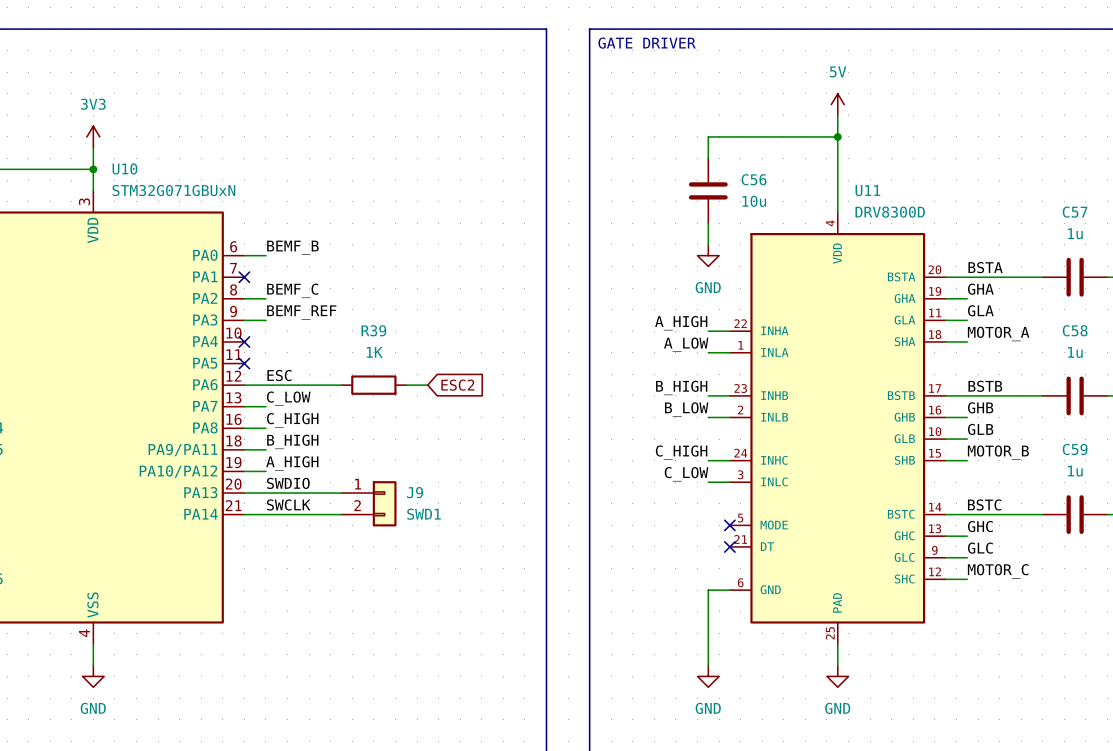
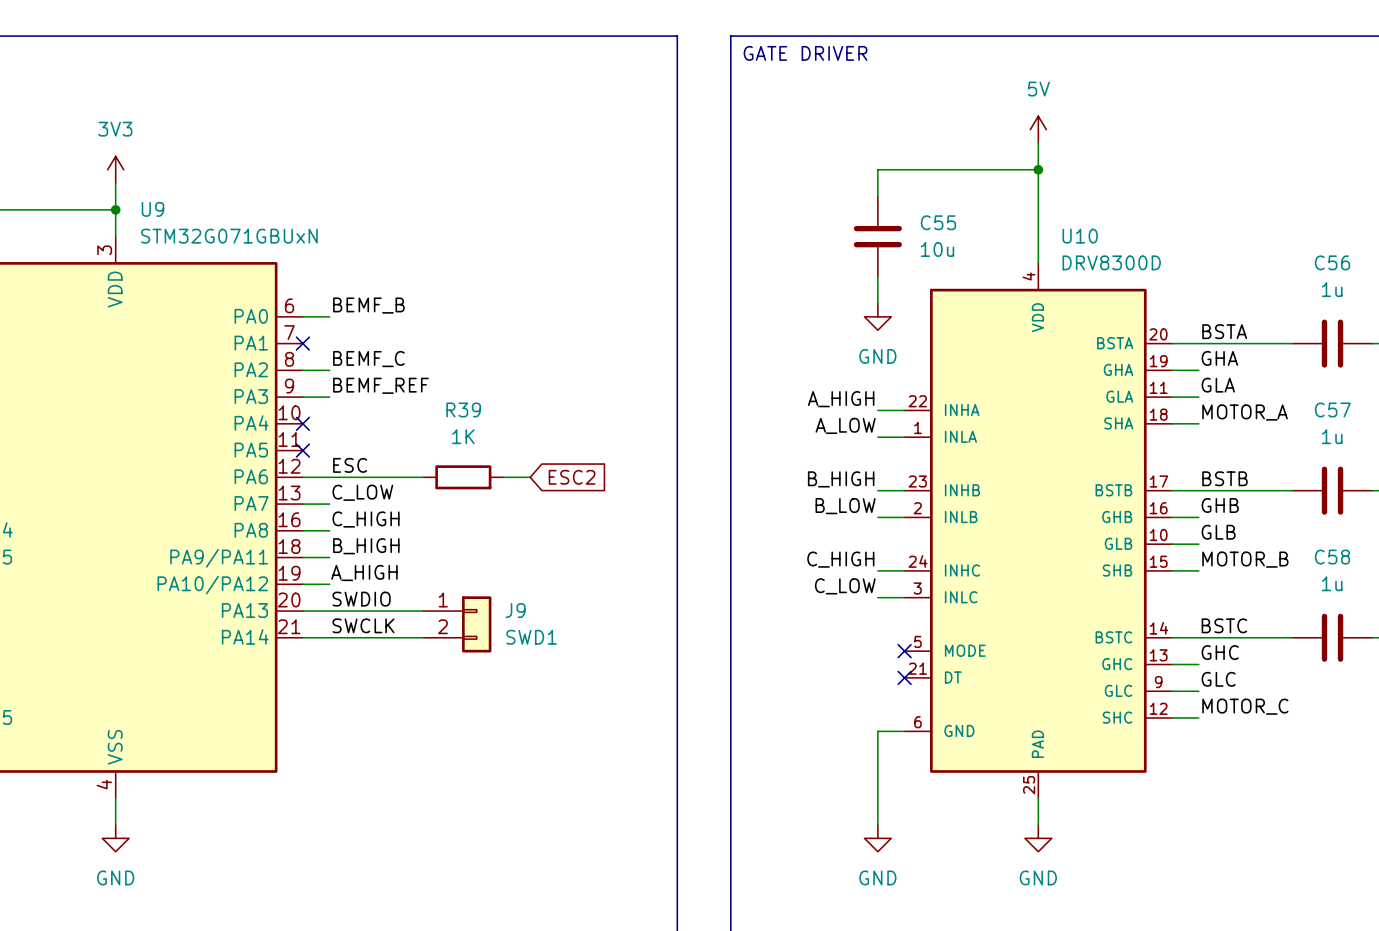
U10 name: U10 (124, 168) -> U9 (153, 209)
C56 name: C56 (754, 179) -> C55 (938, 222)
U11 name: U11 (867, 190) -> U10 (1080, 236)
C57 name: C57 (1075, 212) -> C56 (1332, 262)
C58 name: C58 (1075, 330) -> C57 (1332, 409)
C59 name: C59 (1075, 449) -> C58 (1332, 557)

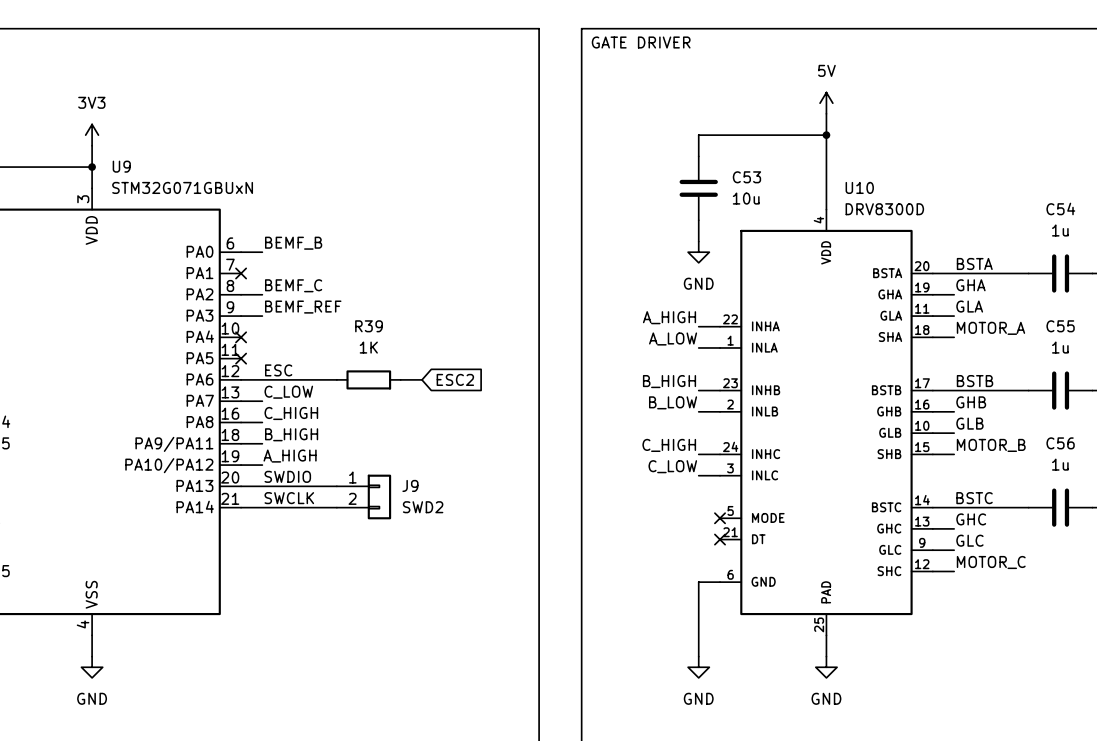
C55 name: C55 (938, 222) -> C53 (746, 177)
C56 name: C56 (1332, 262) -> C54 (1060, 208)
C57 name: C57 (1332, 409) -> C55 (1060, 326)
C58 name: C58 (1332, 557) -> C56 (1060, 443)
J9 value: SWD1 (531, 637) -> SWD2 (423, 507)

